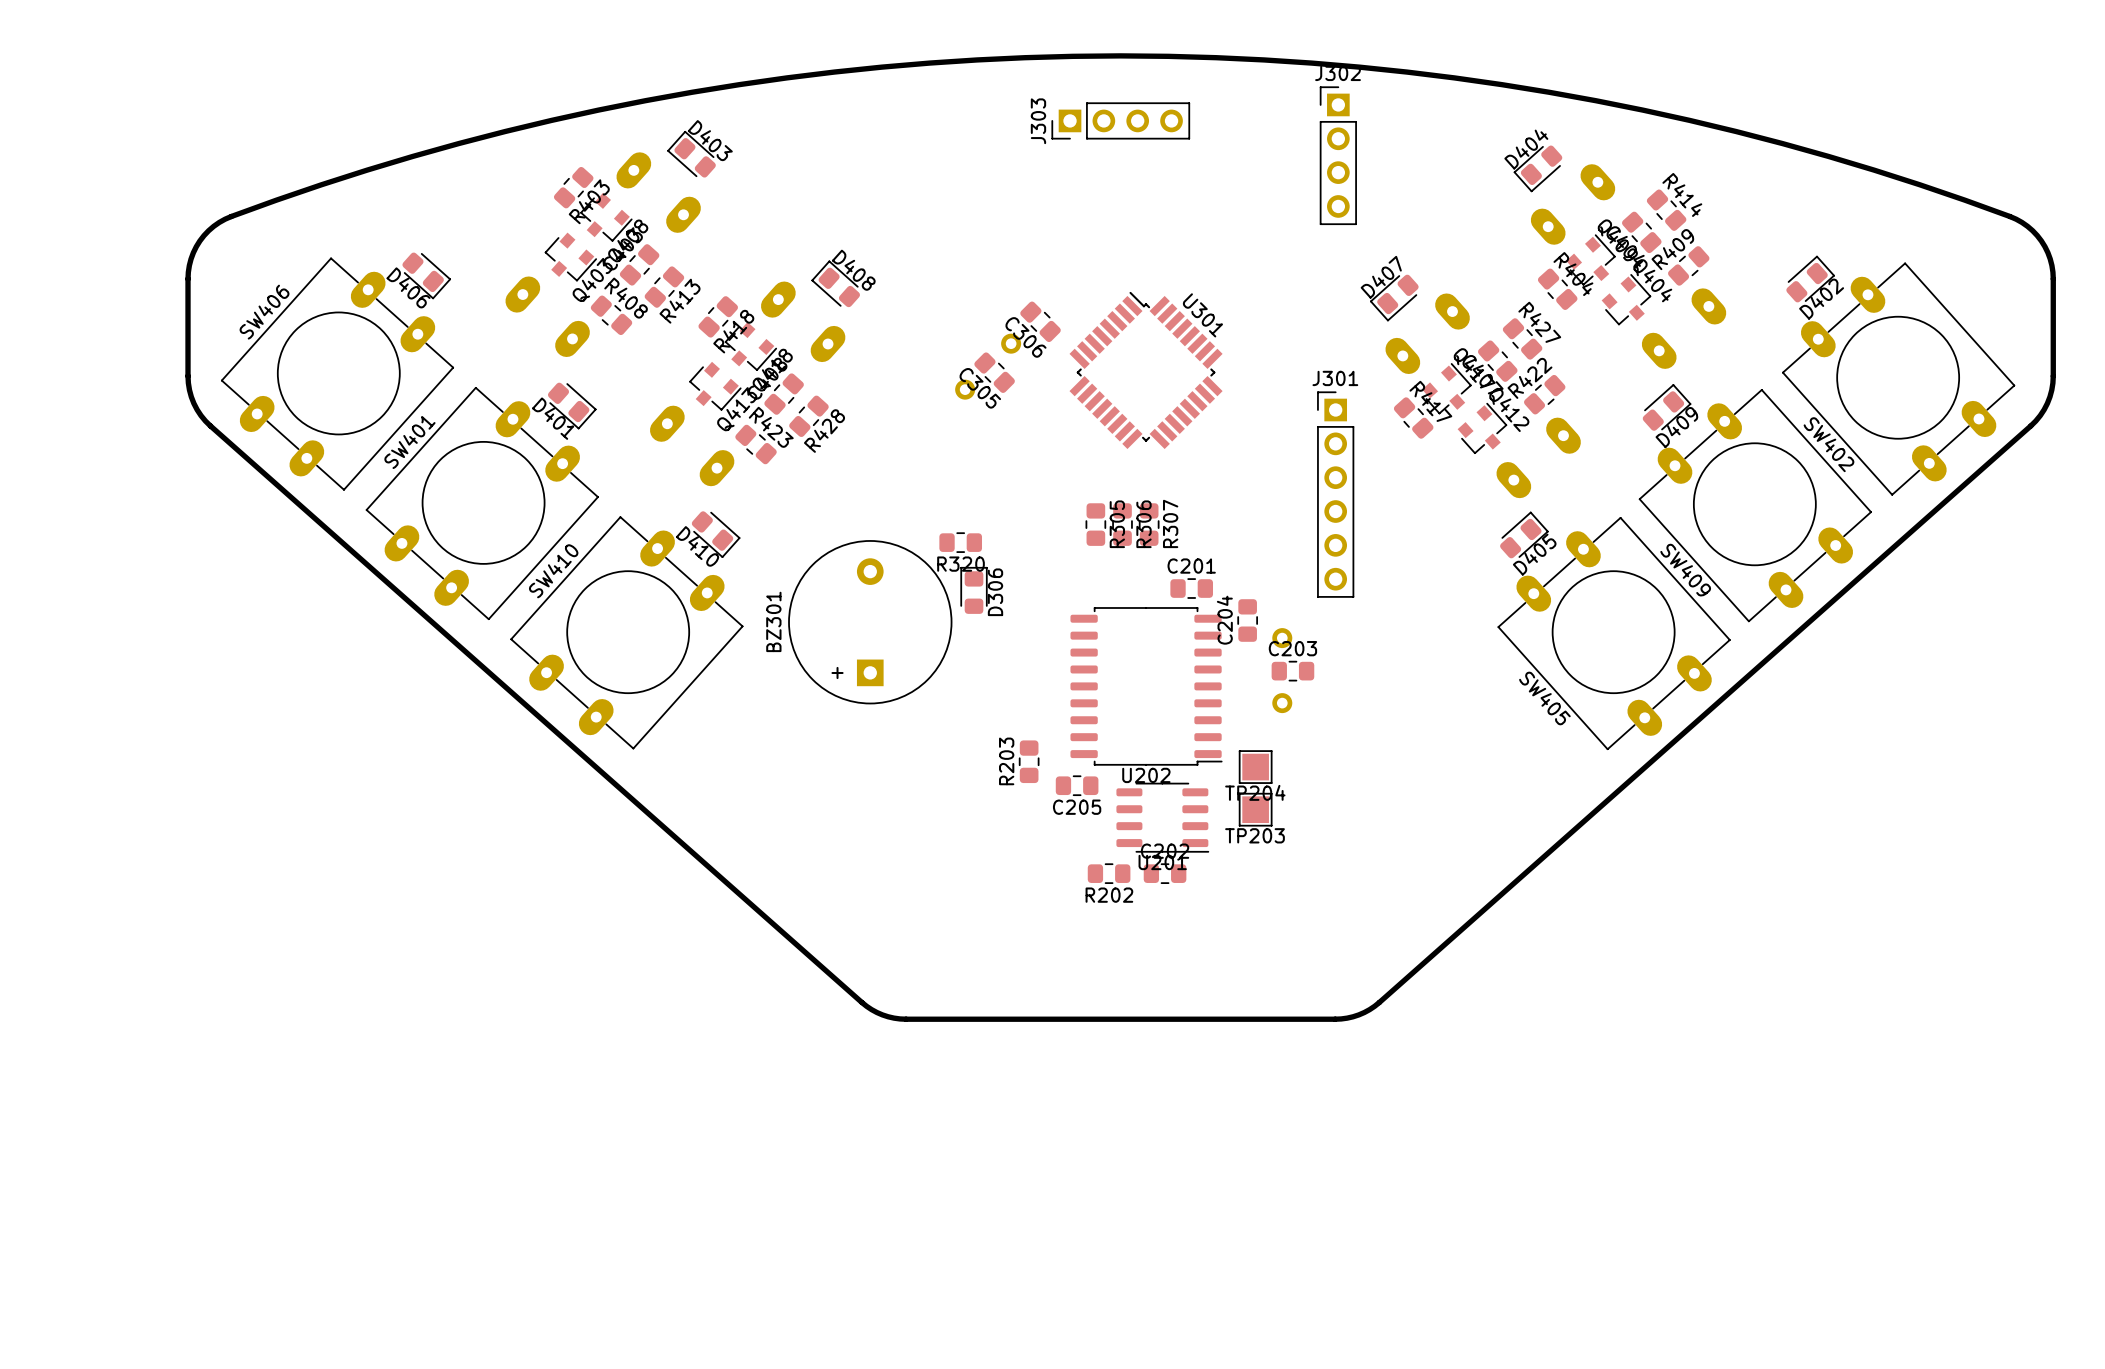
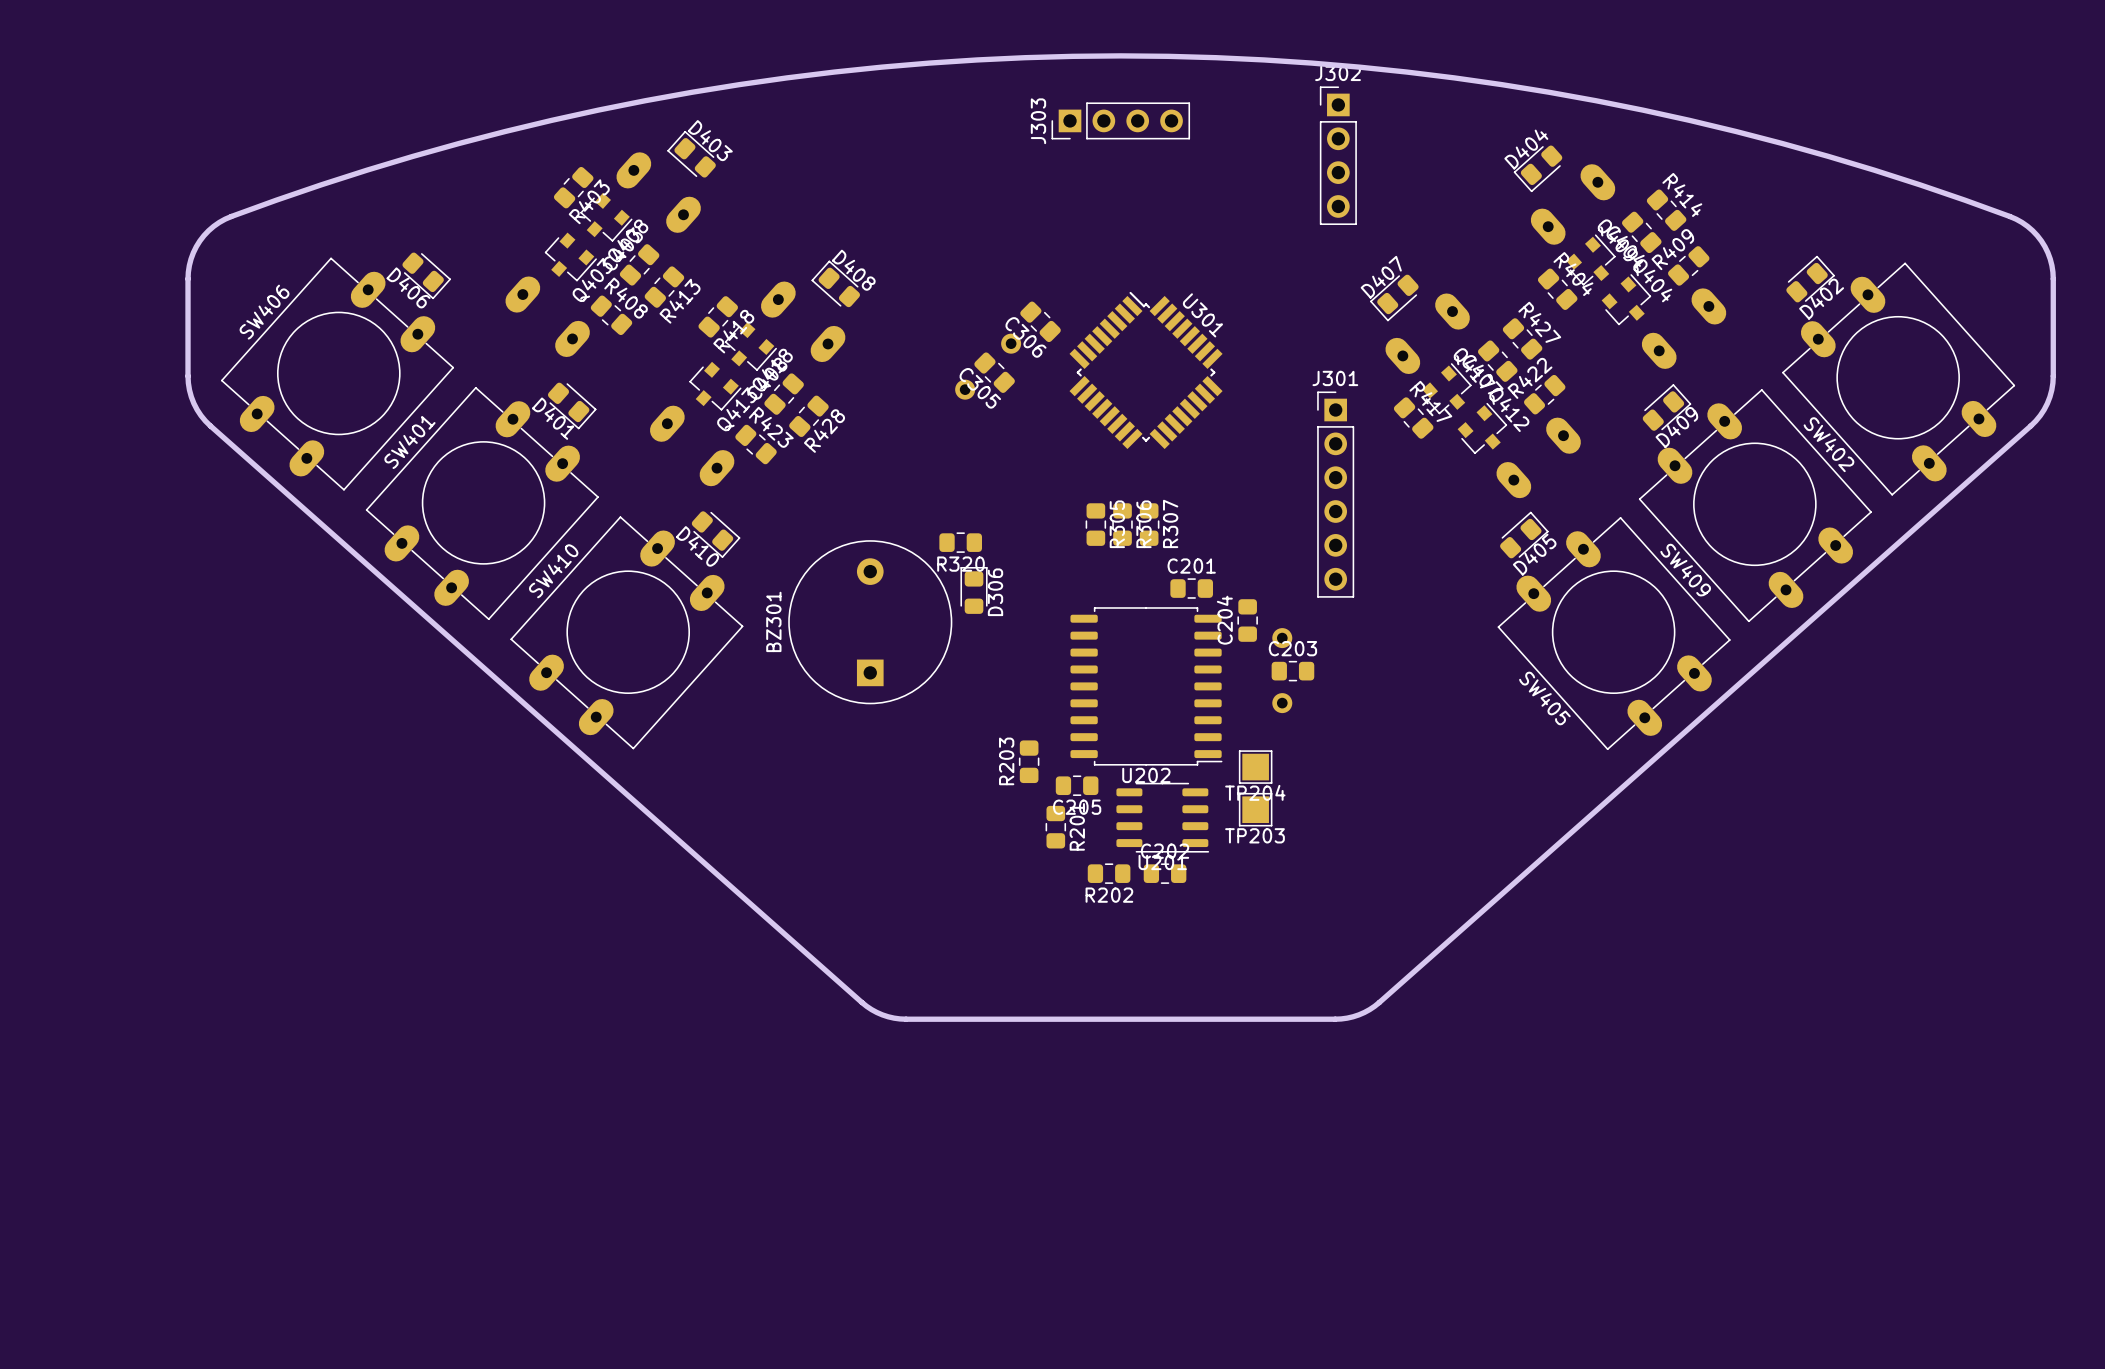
BZ301 text: + (837, 673) -> none
R201: none -> (1055, 827)

